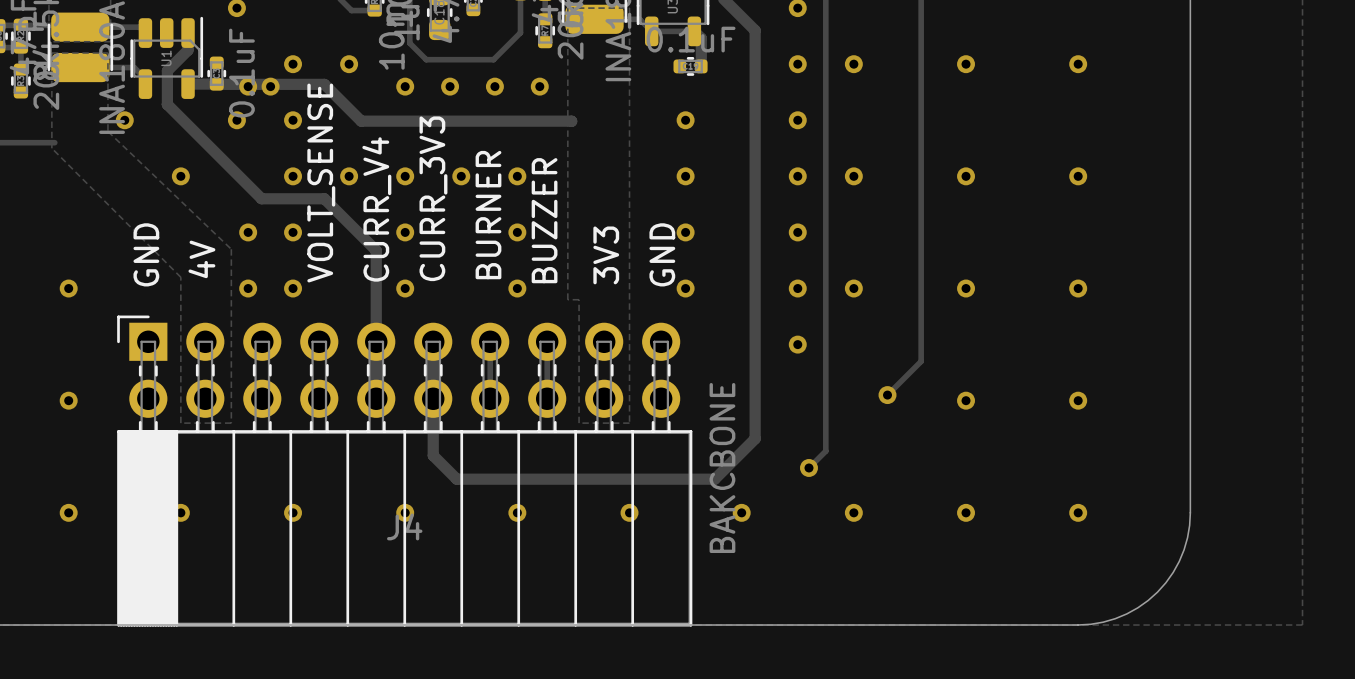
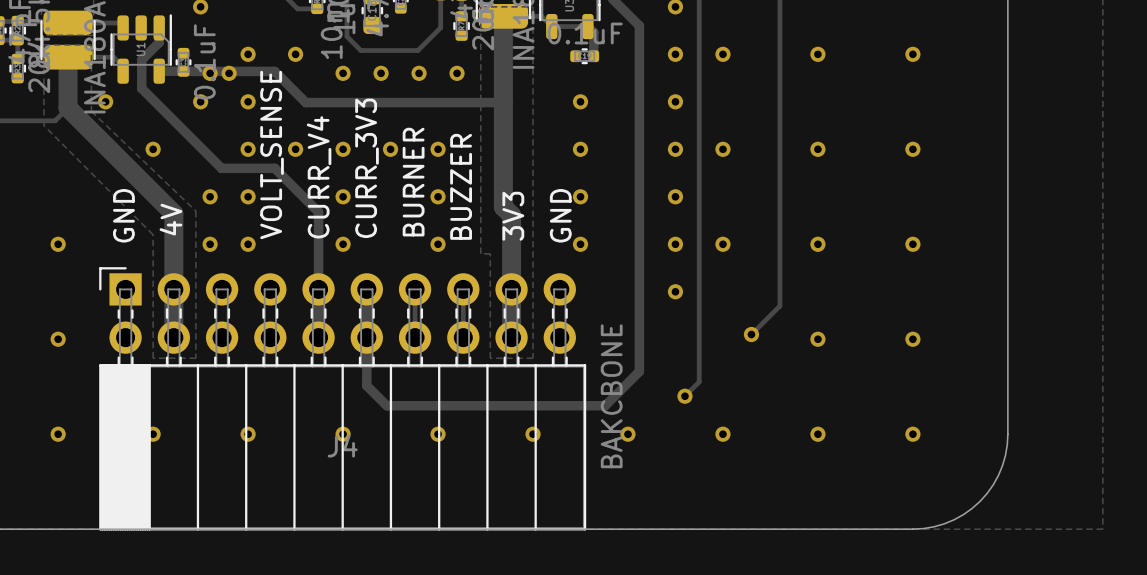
track: none -> (503, 16) (503, 101)
track: none -> (68, 57) (68, 107)
track: none -> (483, 102) (503, 102) (503, 207) (511, 215) (511, 337)
track: none -> (68, 107) (55, 120) (46, 120)
track: none -> (68, 107) (173, 213) (173, 337)

